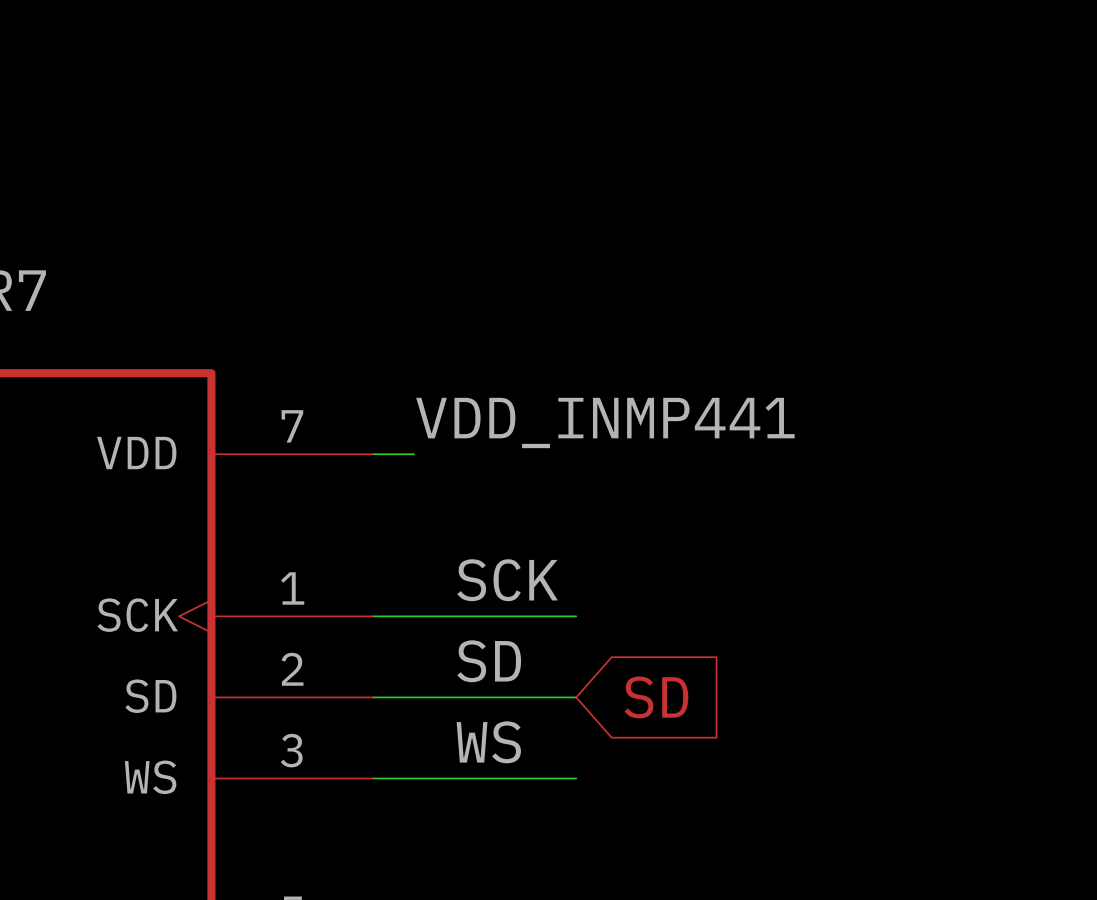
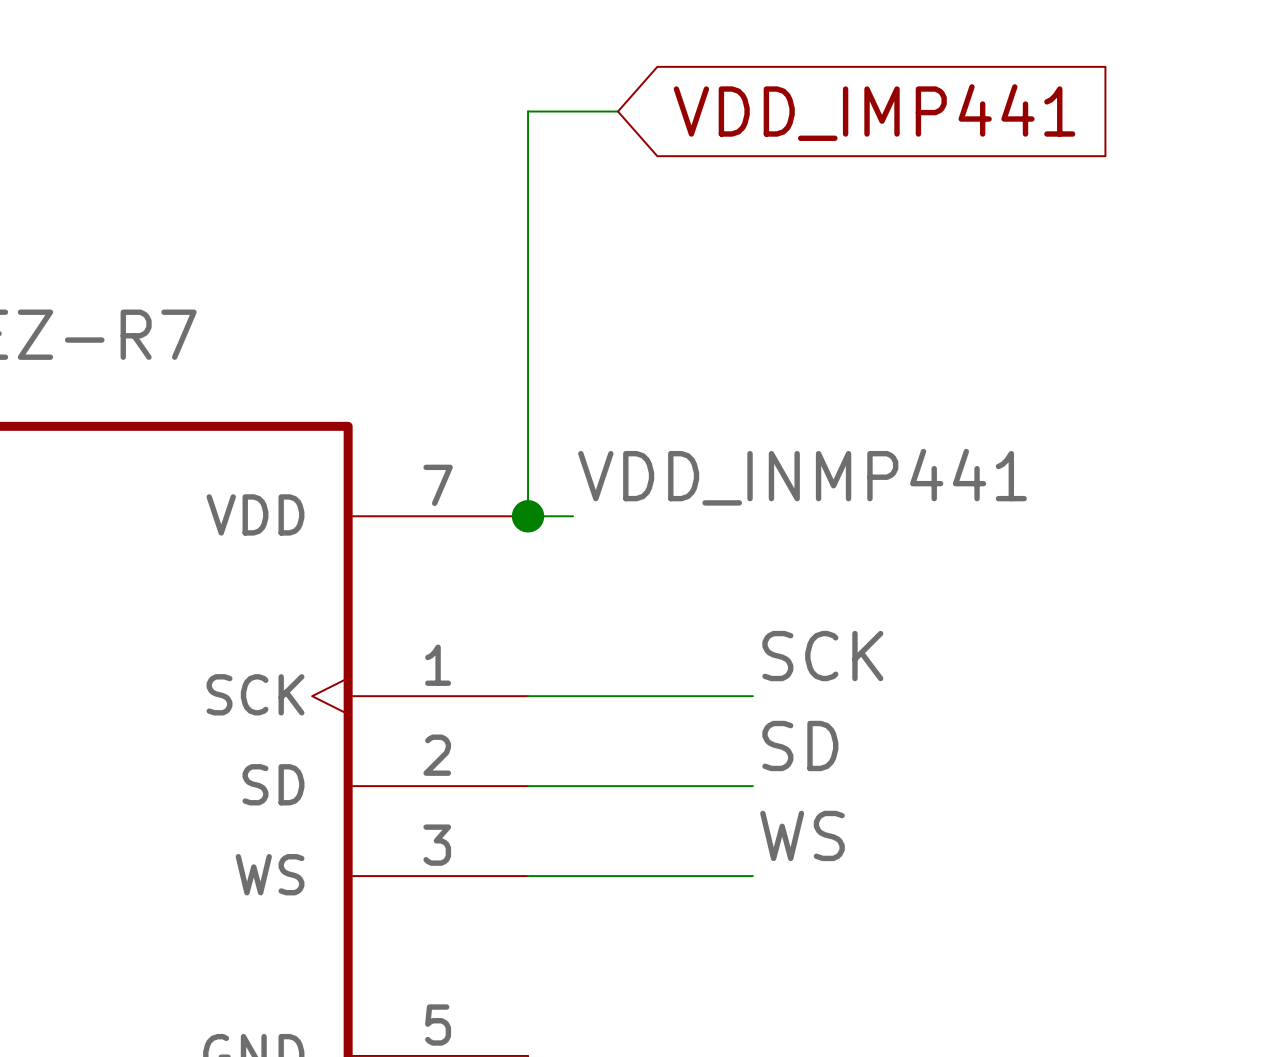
wire: none -> (617, 111) (528, 111) (528, 516)
global label: none -> VDD_IMP441 (874, 112)
junction: none -> (528, 516)
label position: SCK (507, 580) -> SCK (822, 656)
label position: SD (489, 661) -> SD (800, 745)
global label: SD (656, 697) -> none
label position: WS (488, 742) -> WS (802, 835)

